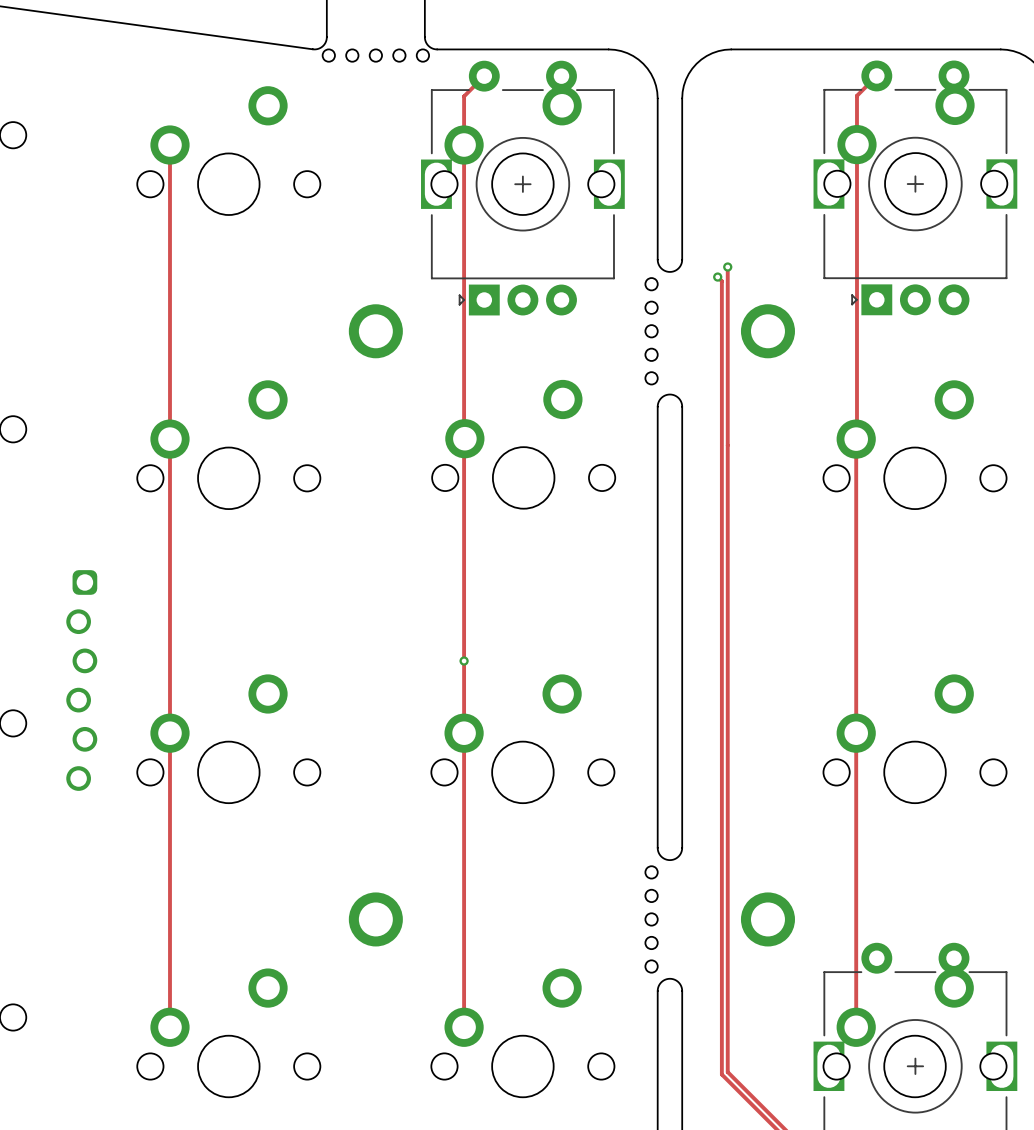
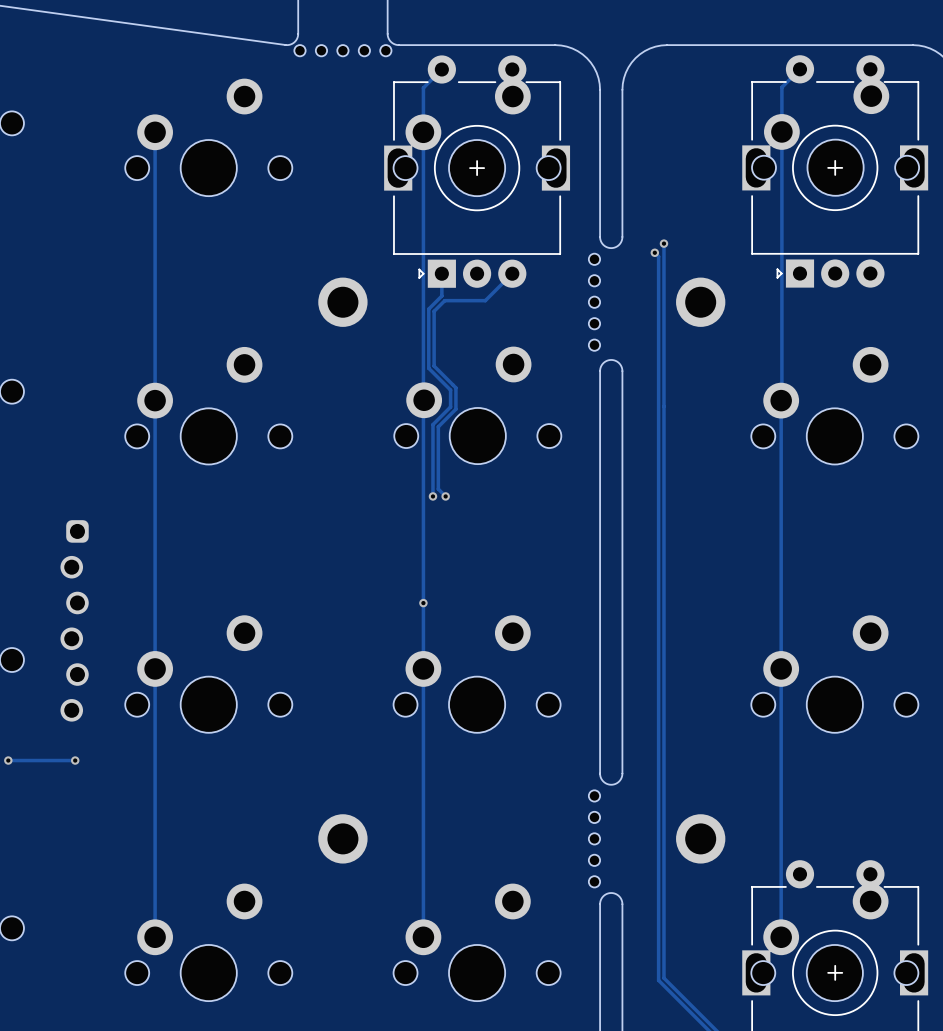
track: none -> (441, 273) (441, 296) (428, 309) (428, 368) (450, 390) (450, 407) (432, 424) (432, 496)
track: none -> (512, 273) (485, 300) (444, 300) (434, 311) (434, 366) (455, 387) (455, 409) (438, 426) (438, 489) (445, 496)
via: none -> (432, 496)
via: none -> (445, 496)
track: none -> (8, 760) (75, 760)
via: none -> (8, 760)
via: none -> (75, 760)

